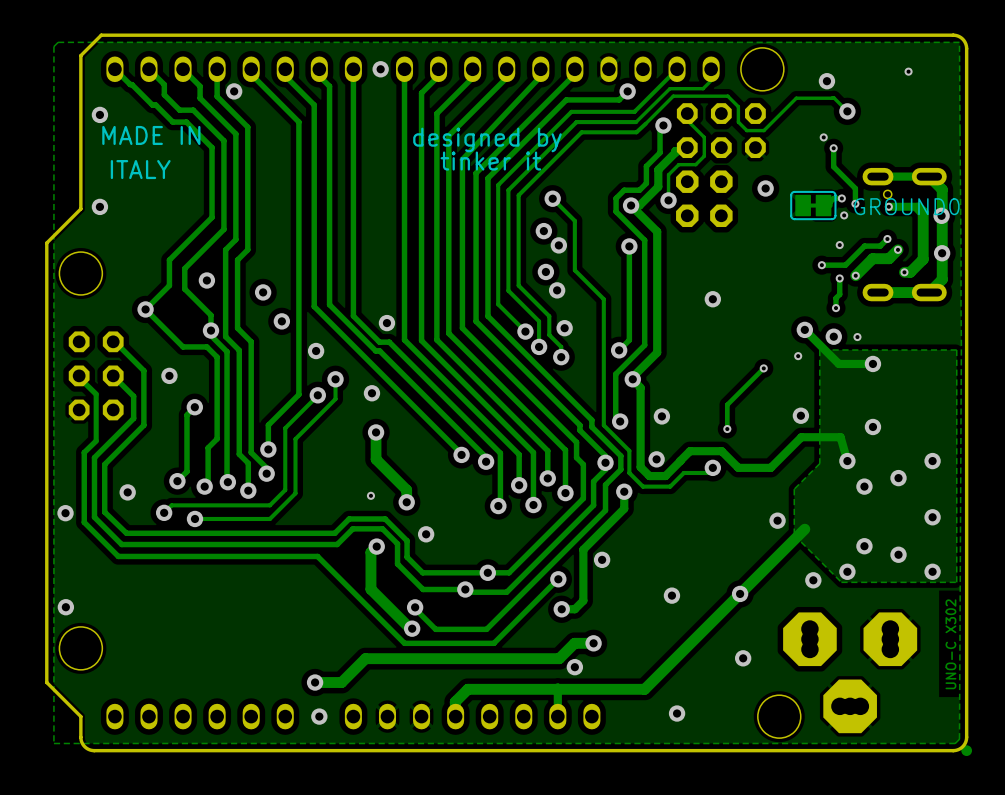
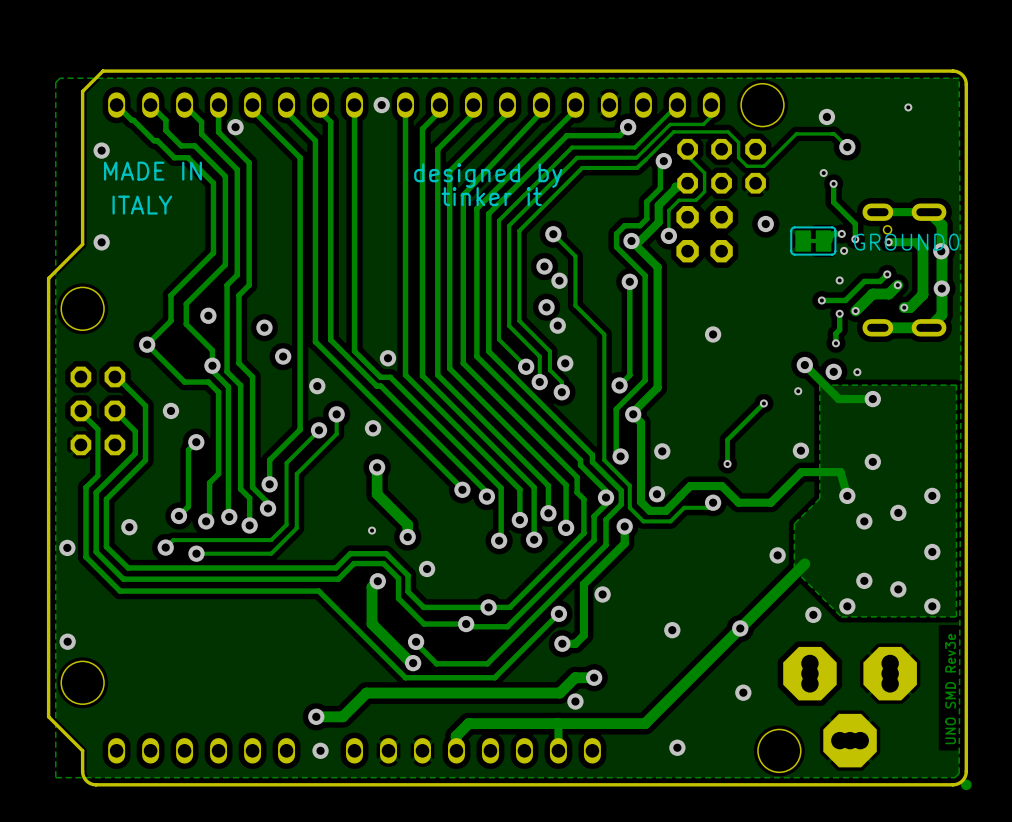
text: UNO-C X302 (950, 644) -> UNO SMD Rev3e (950, 689)

